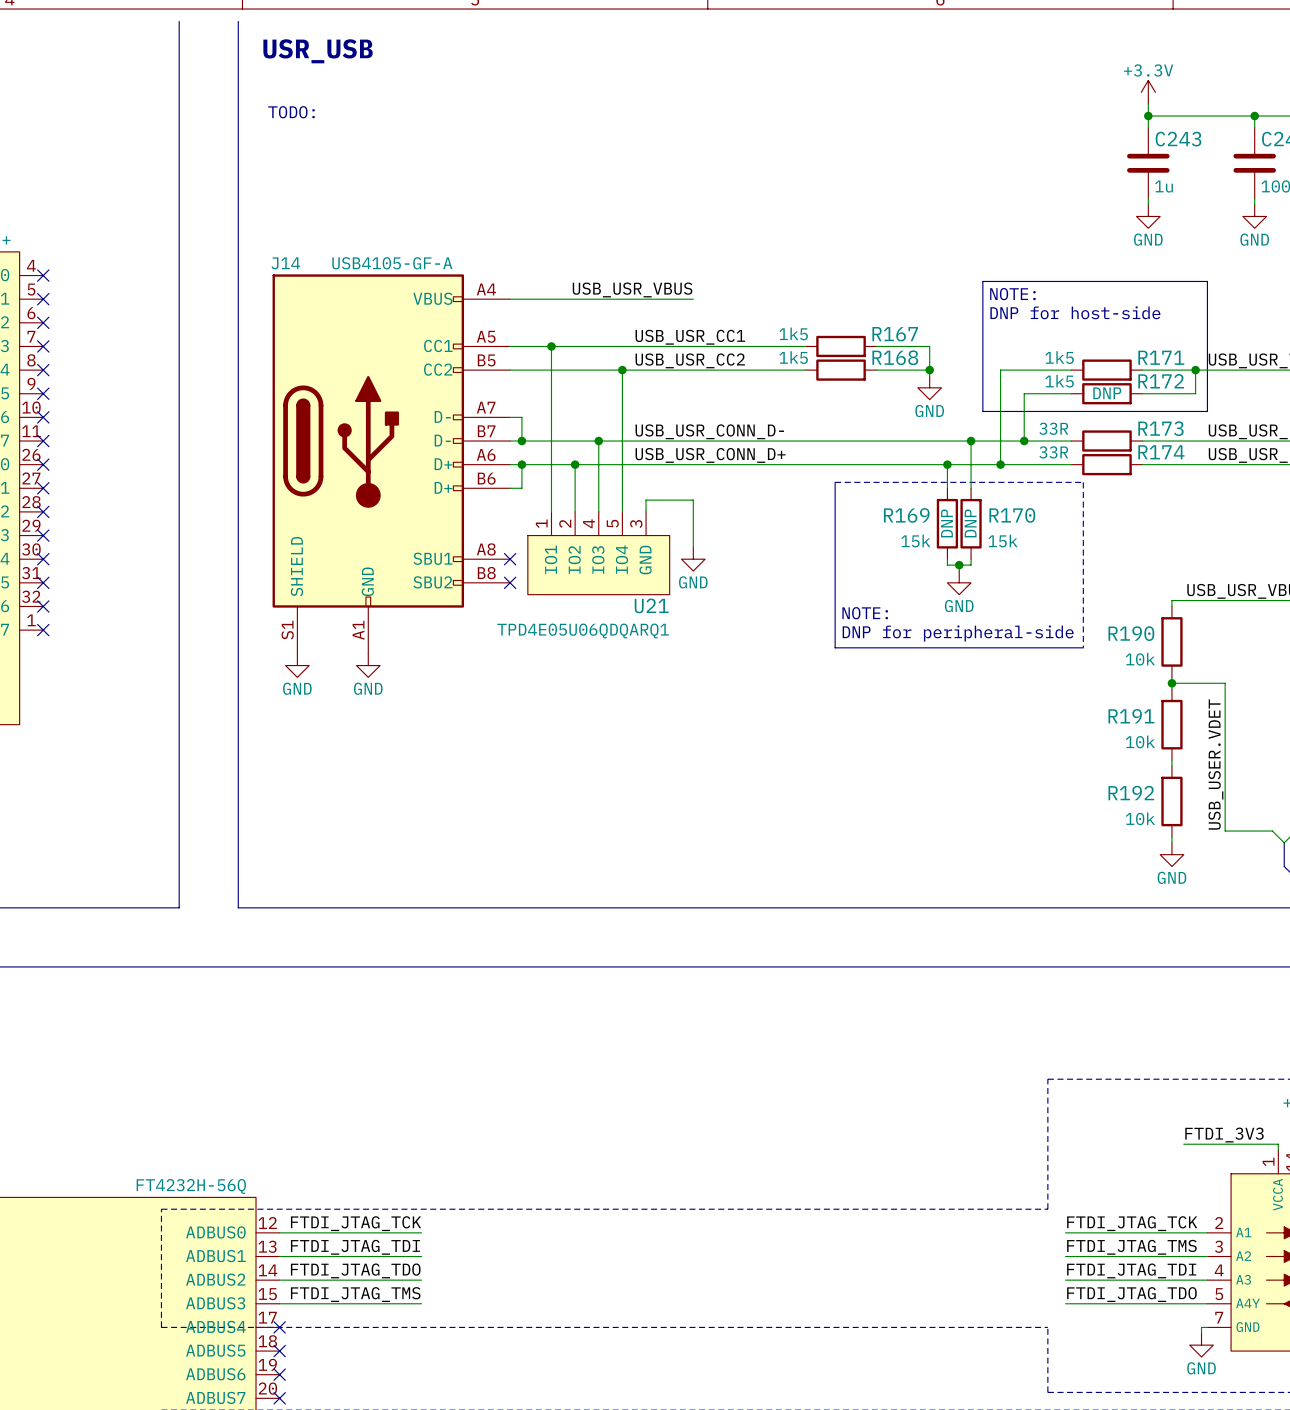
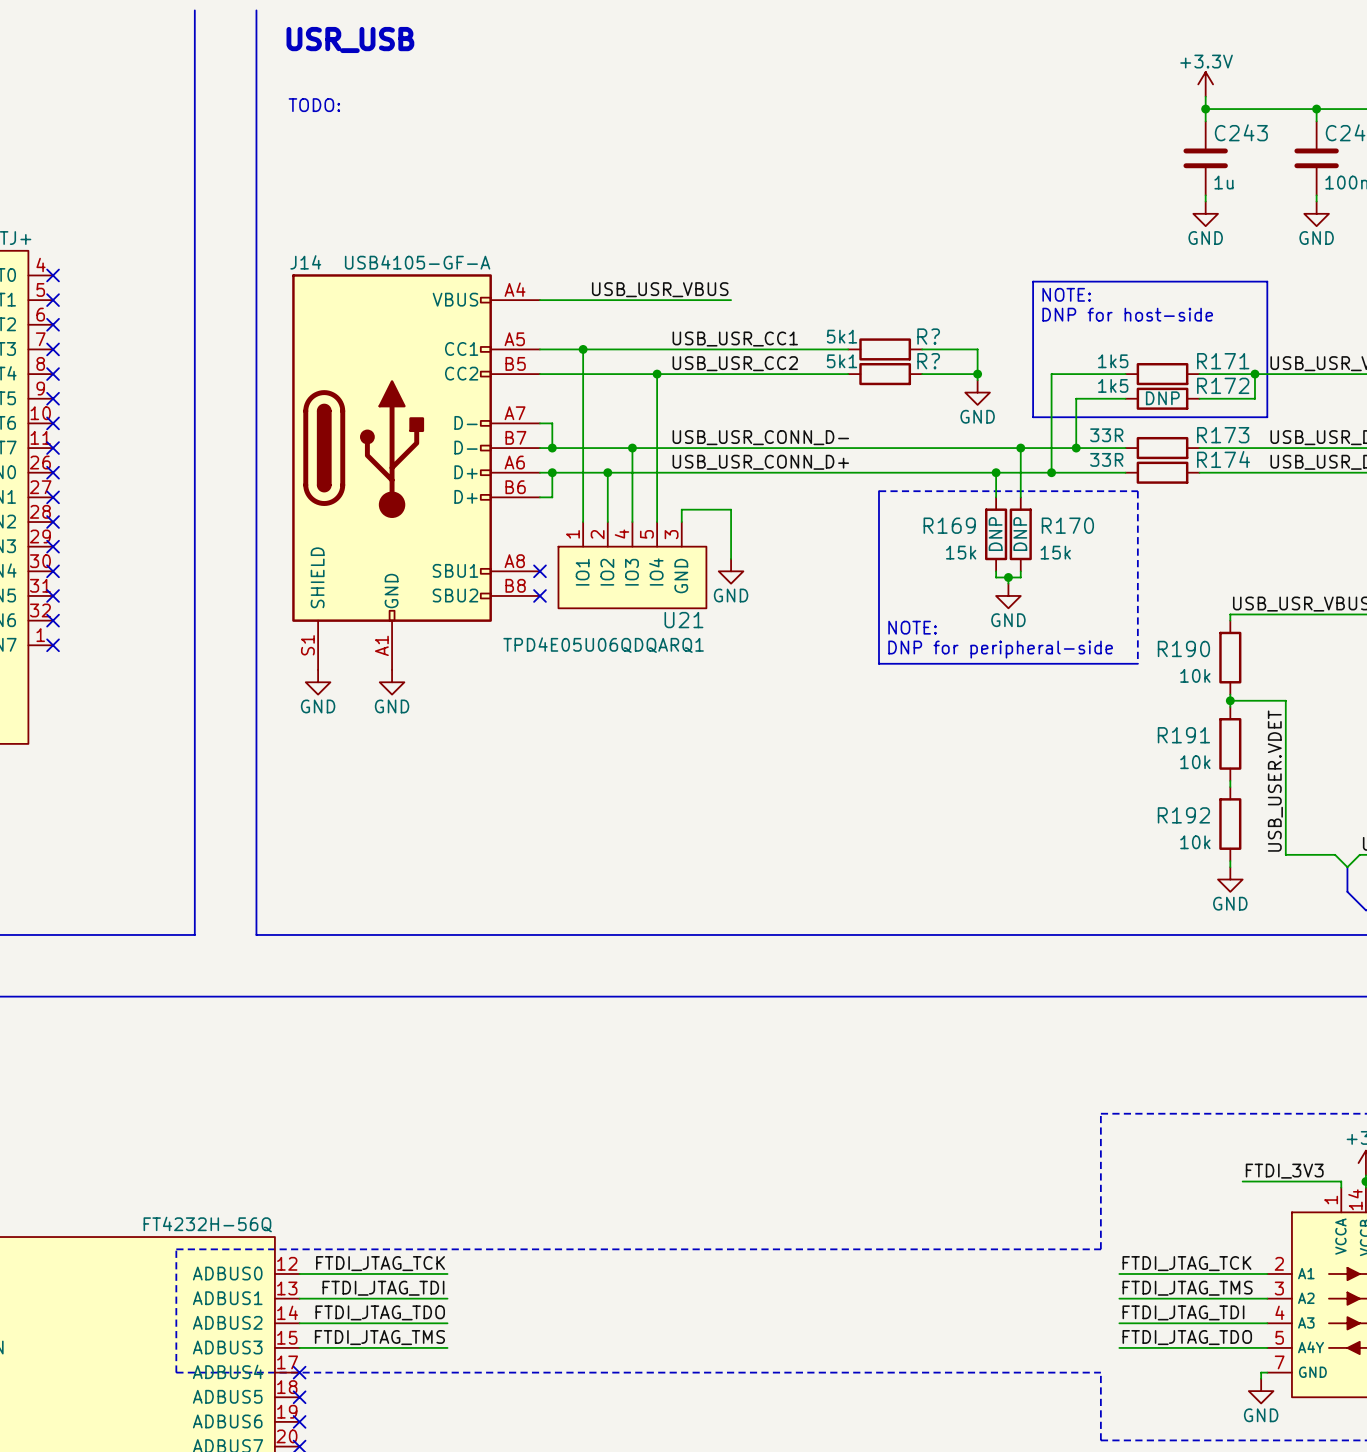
R167 text: 1k5 (793, 333) -> 5k1 (842, 336)
R167 name: R167 (895, 334) -> R? (928, 336)
R168 text: 1k5 (793, 357) -> 5k1 (842, 361)
R168 name: R168 (895, 357) -> R? (928, 361)

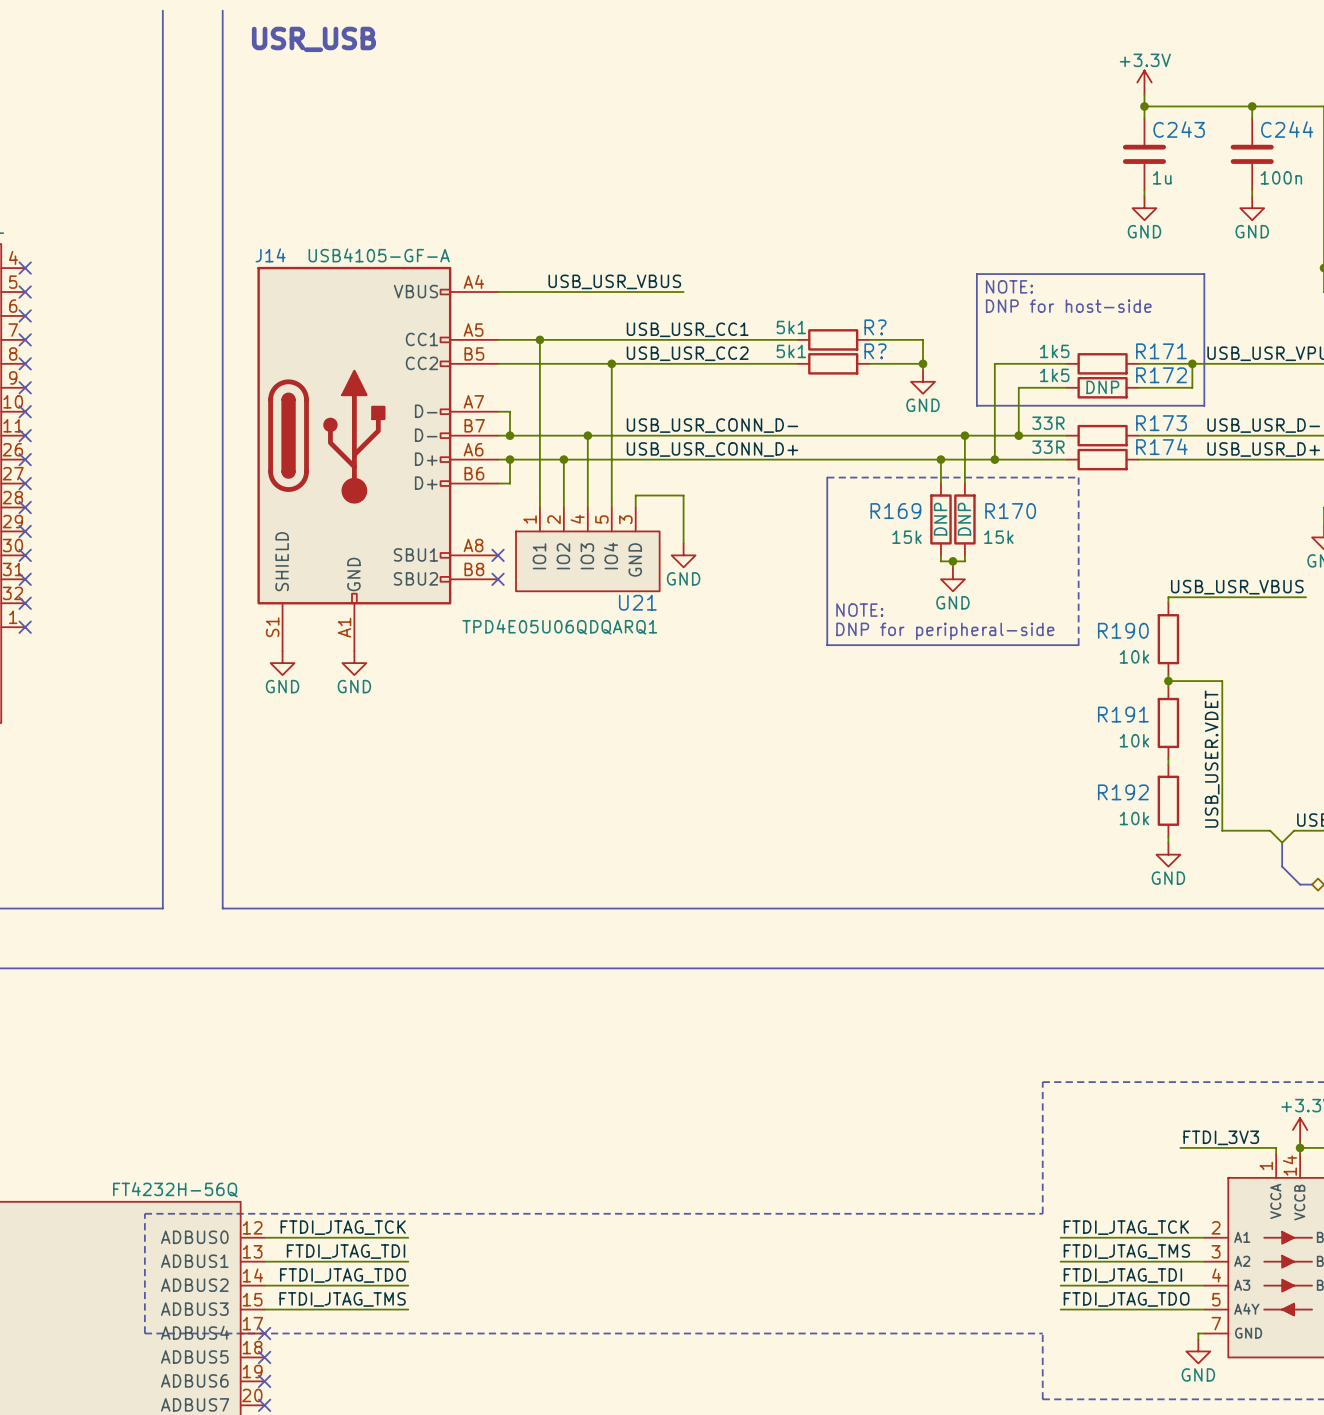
text: TODO: (314, 105) -> none

